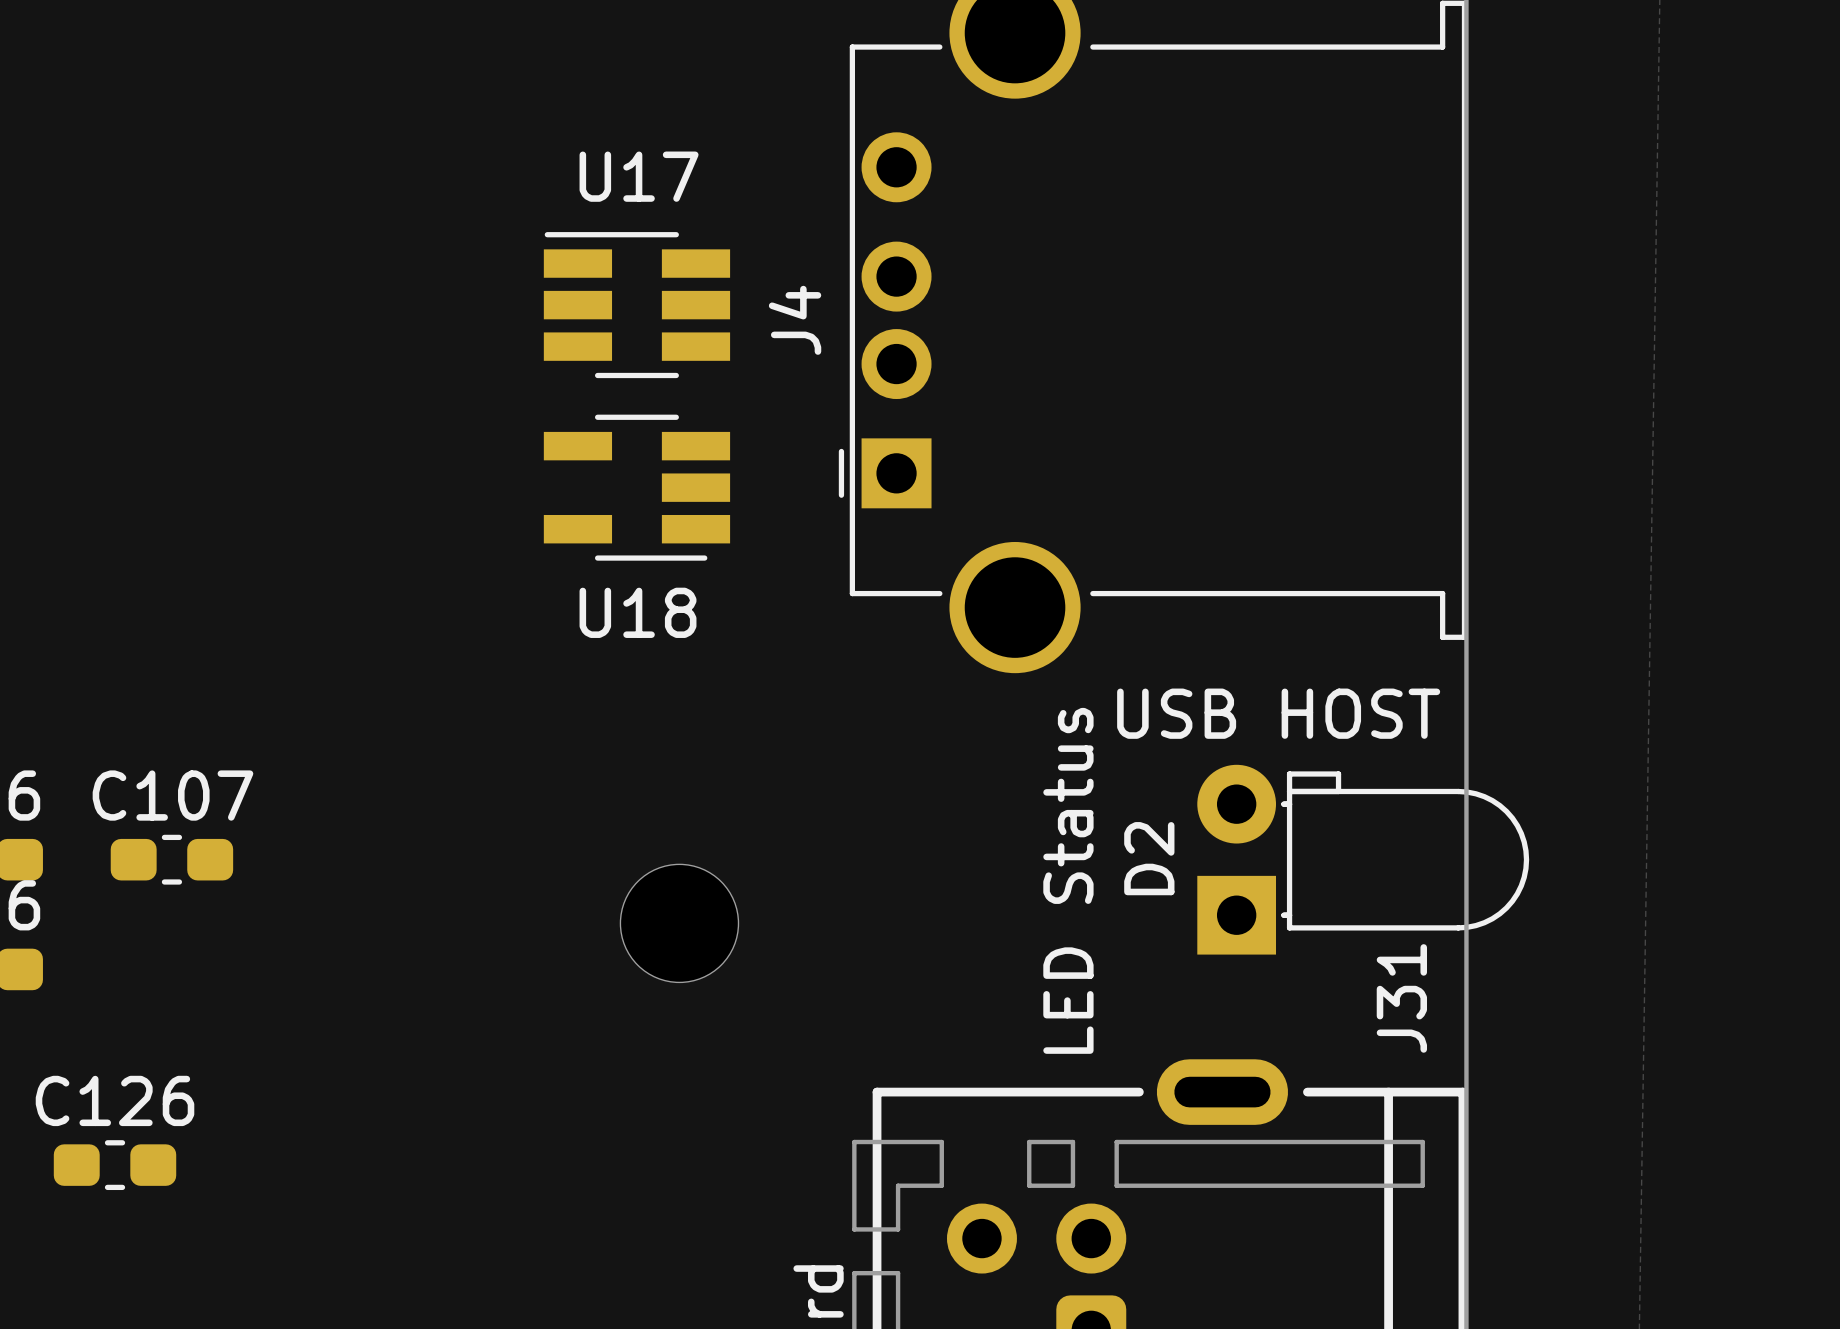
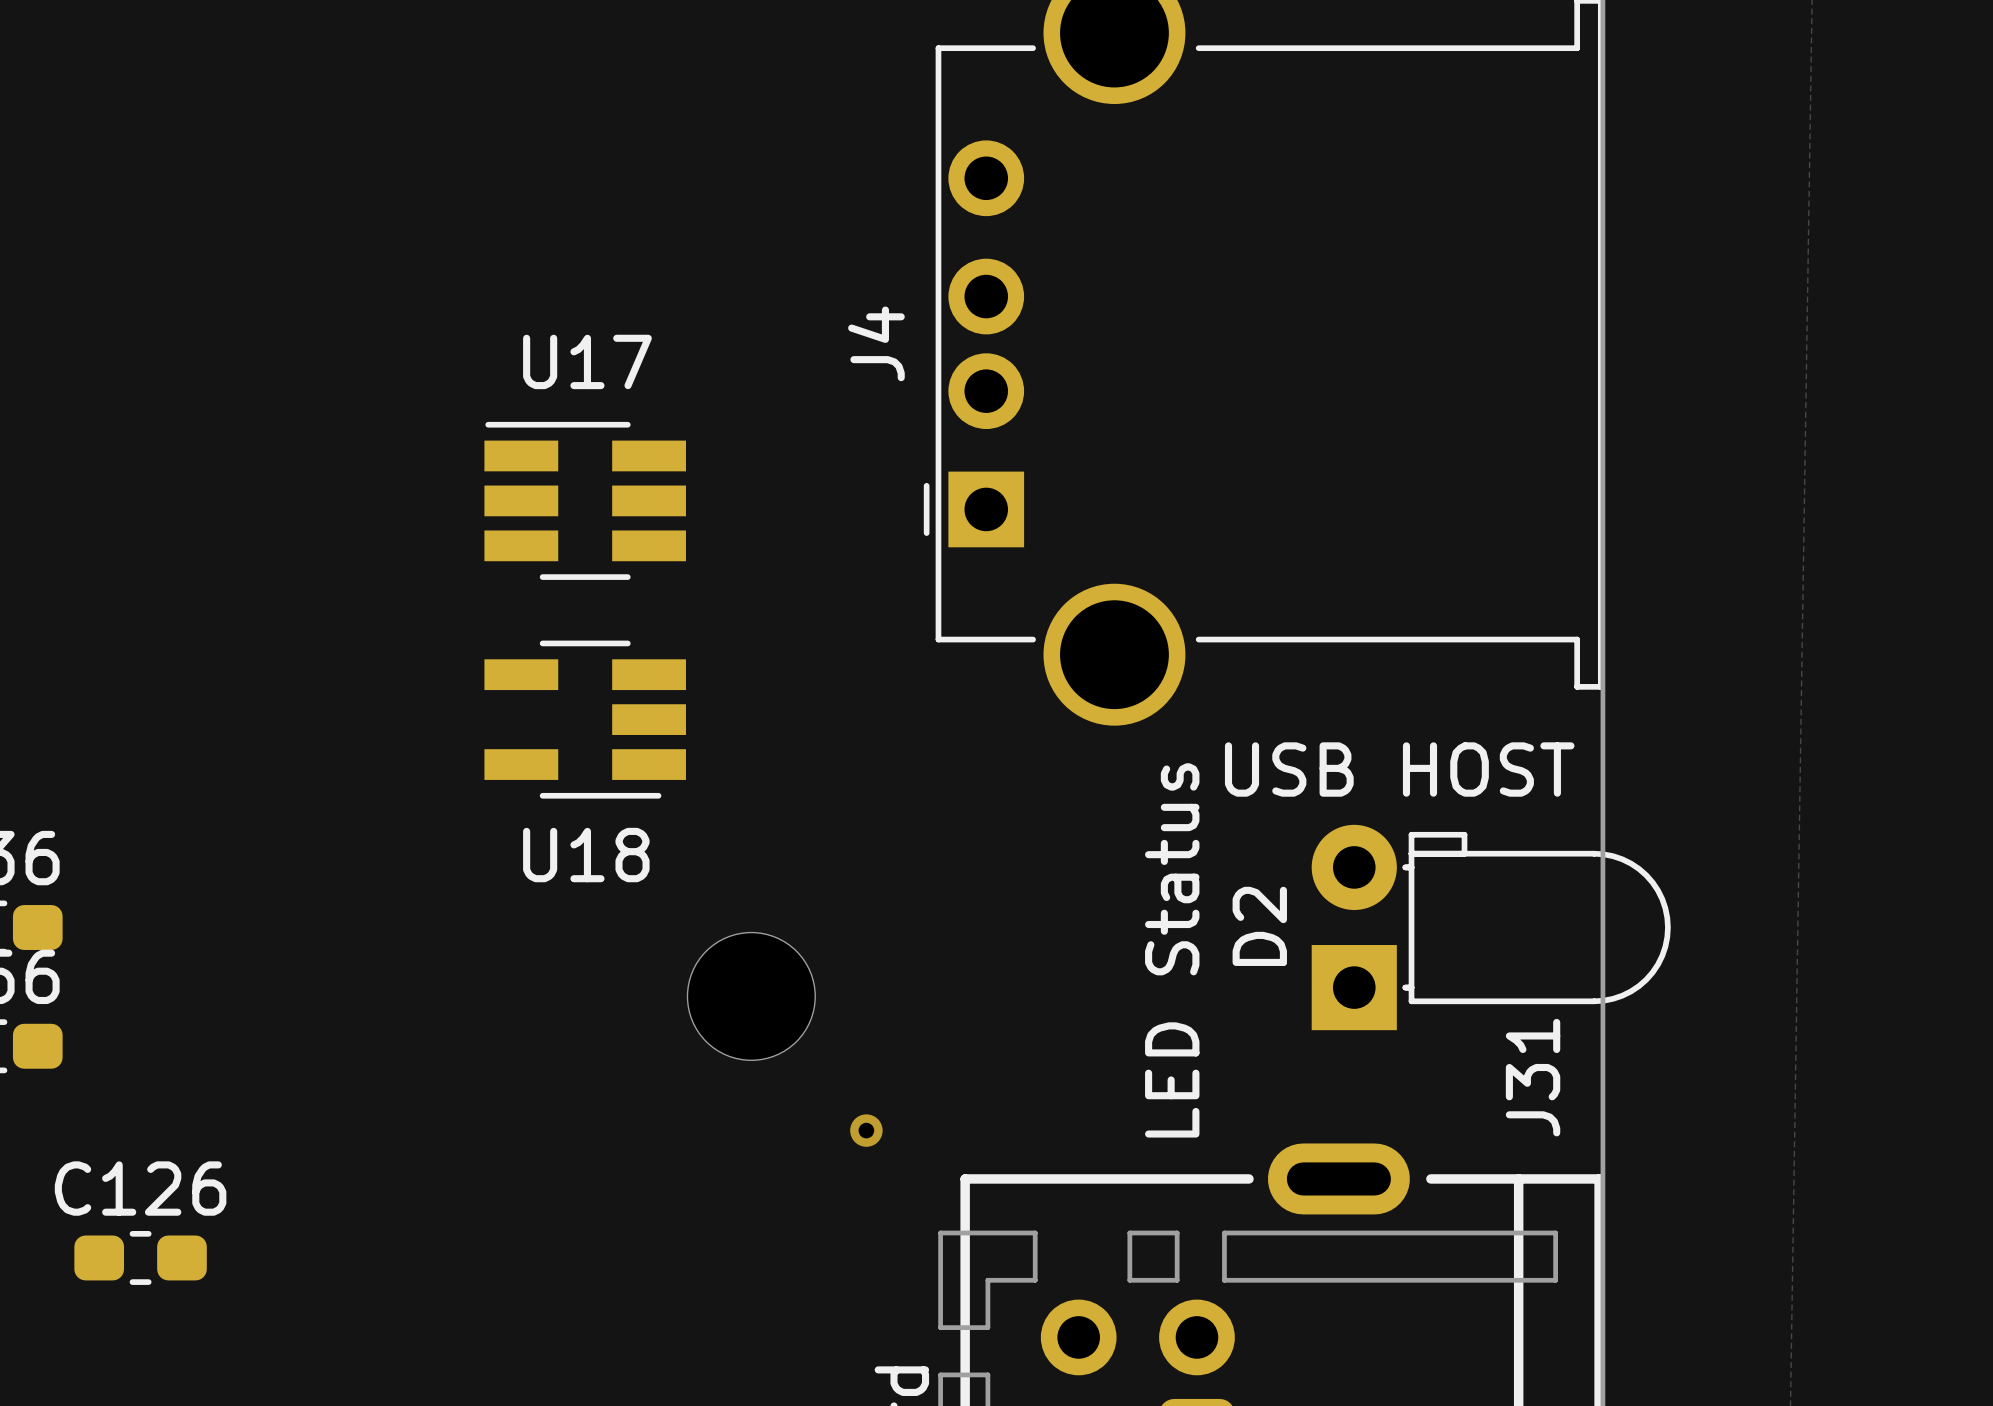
U17 position: (636, 305) -> (585, 500)
U18 position: (636, 487) -> (585, 719)
C107: (171, 859) -> none
via: none -> (866, 1130)

